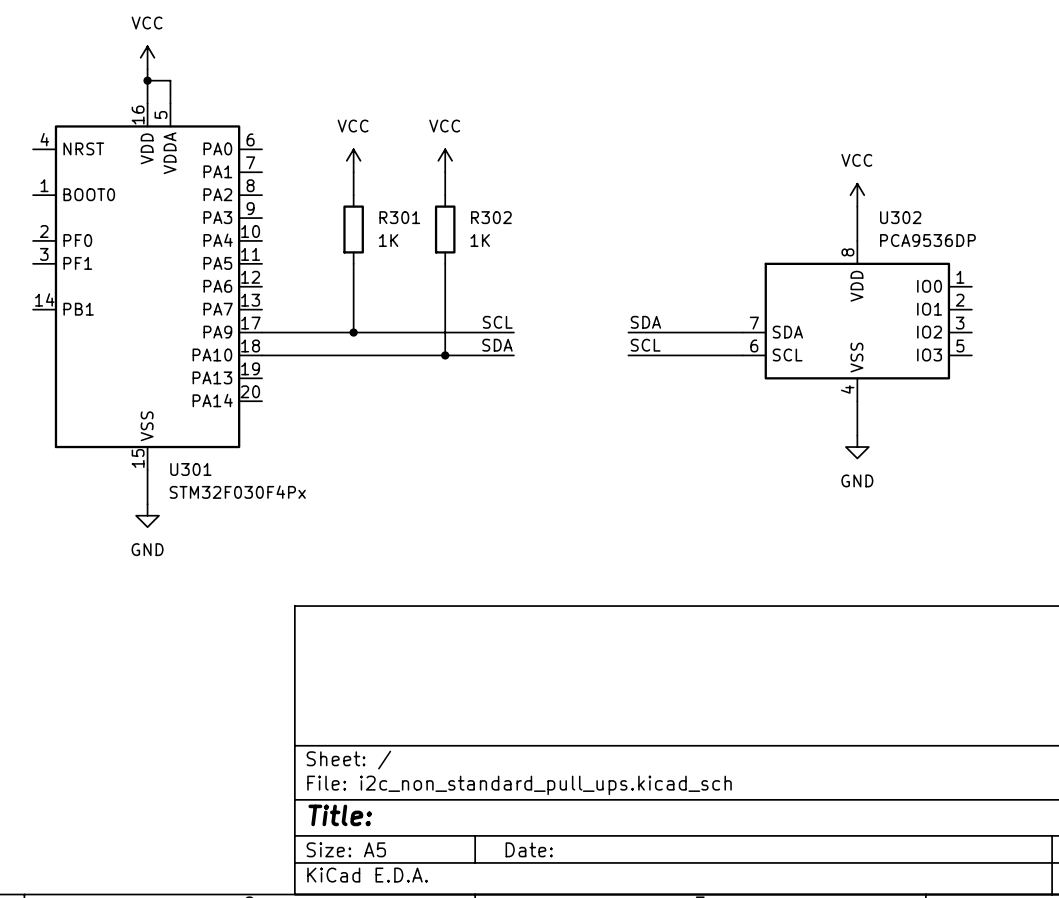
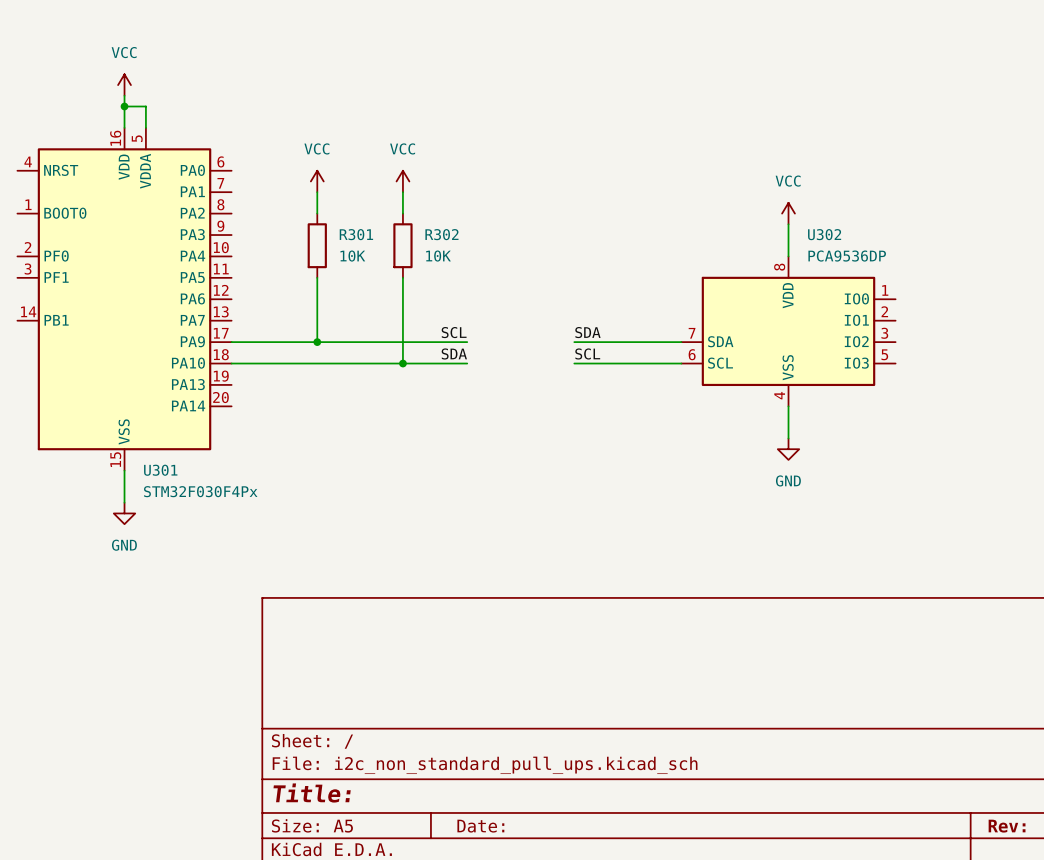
R301 value: 1K (388, 240) -> 10K (352, 256)
R302 value: 1K (480, 240) -> 10K (438, 256)

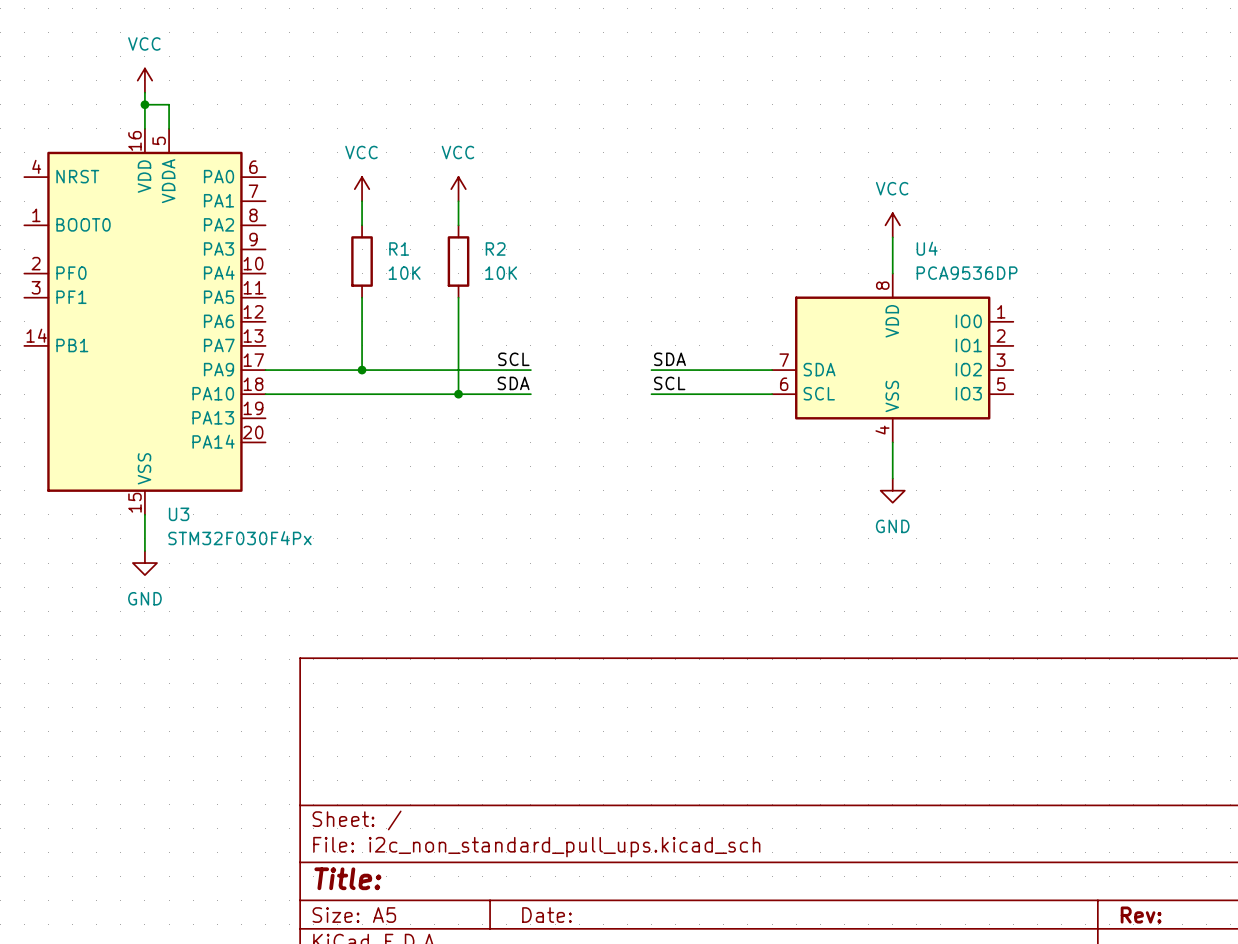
R301 name: R301 (356, 234) -> R1 (399, 249)
R302 name: R302 (441, 234) -> R2 (495, 249)
U302 name: U302 (824, 234) -> U4 (927, 248)
U301 name: U301 (160, 470) -> U3 (179, 514)

